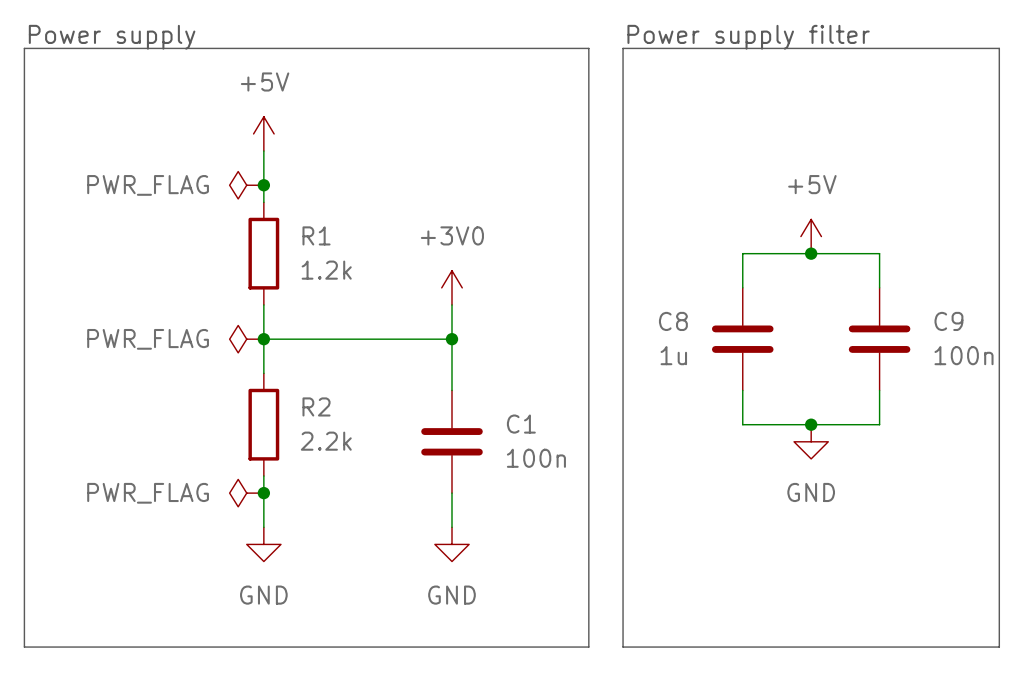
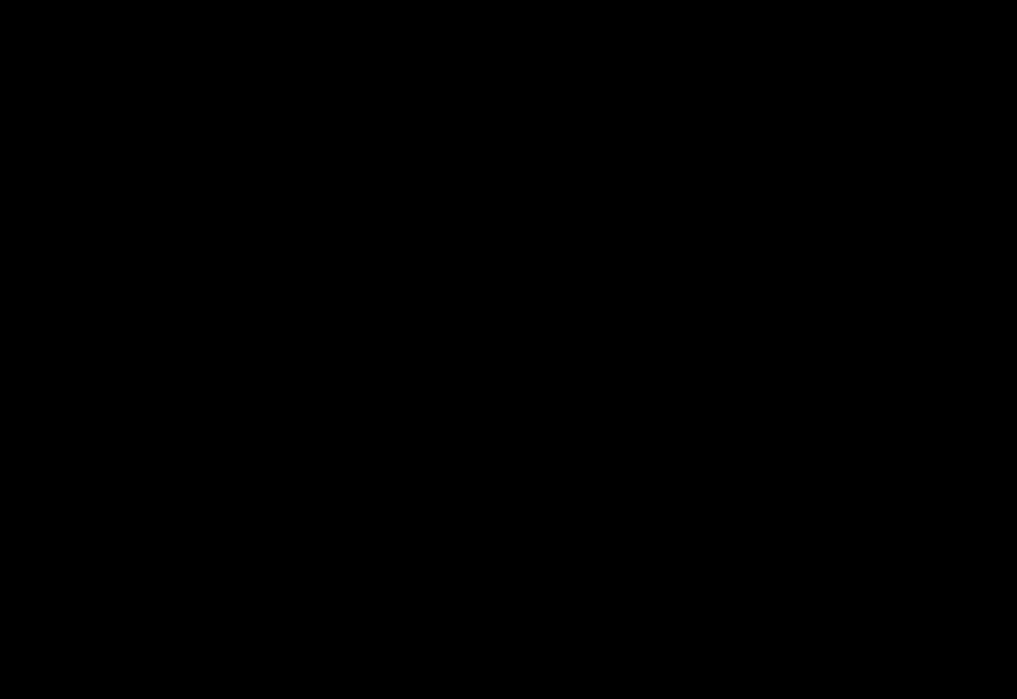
text: Power supply (112, 37) -> none
text: Power supply filter (748, 37) -> none
line: (24, 48) (588, 48) (588, 647) (24, 647) (24, 48) -> none
line: (623, 48) (999, 48) (999, 647) (623, 647) (623, 48) -> none
power symbol: +5V (263, 133) -> none
wire: (263, 151) (263, 202) -> none
power symbol: PWR_FLAG (246, 185) -> none
junction: (263, 185) -> none
power symbol: +5V (811, 236) -> none
R1: 1.2k (263, 253) -> none
junction: (811, 253) -> none
power symbol: +3V0 (452, 287) -> none
wire: (742, 287) (742, 253) (879, 253) (879, 287) -> none
wire: (263, 304) (263, 373) -> none
wire: (452, 304) (452, 390) -> none
power symbol: PWR_FLAG (246, 339) -> none
wire: (263, 339) (452, 339) -> none
junction: (263, 339) -> none
junction: (452, 339) -> none
C8: 1u (742, 339) -> none
C9: 100n (879, 339) -> none
wire: (742, 390) (742, 424) (879, 424) (879, 390) -> none
R2: 2.2k (263, 424) -> none
junction: (811, 424) -> none
C1: 100n (452, 441) -> none
power symbol: GND (811, 441) -> none
wire: (263, 476) (263, 527) -> none
power symbol: PWR_FLAG (246, 493) -> none
junction: (263, 493) -> none
wire: (452, 493) (452, 527) -> none
power symbol: GND (263, 544) -> none
power symbol: GND (452, 544) -> none

